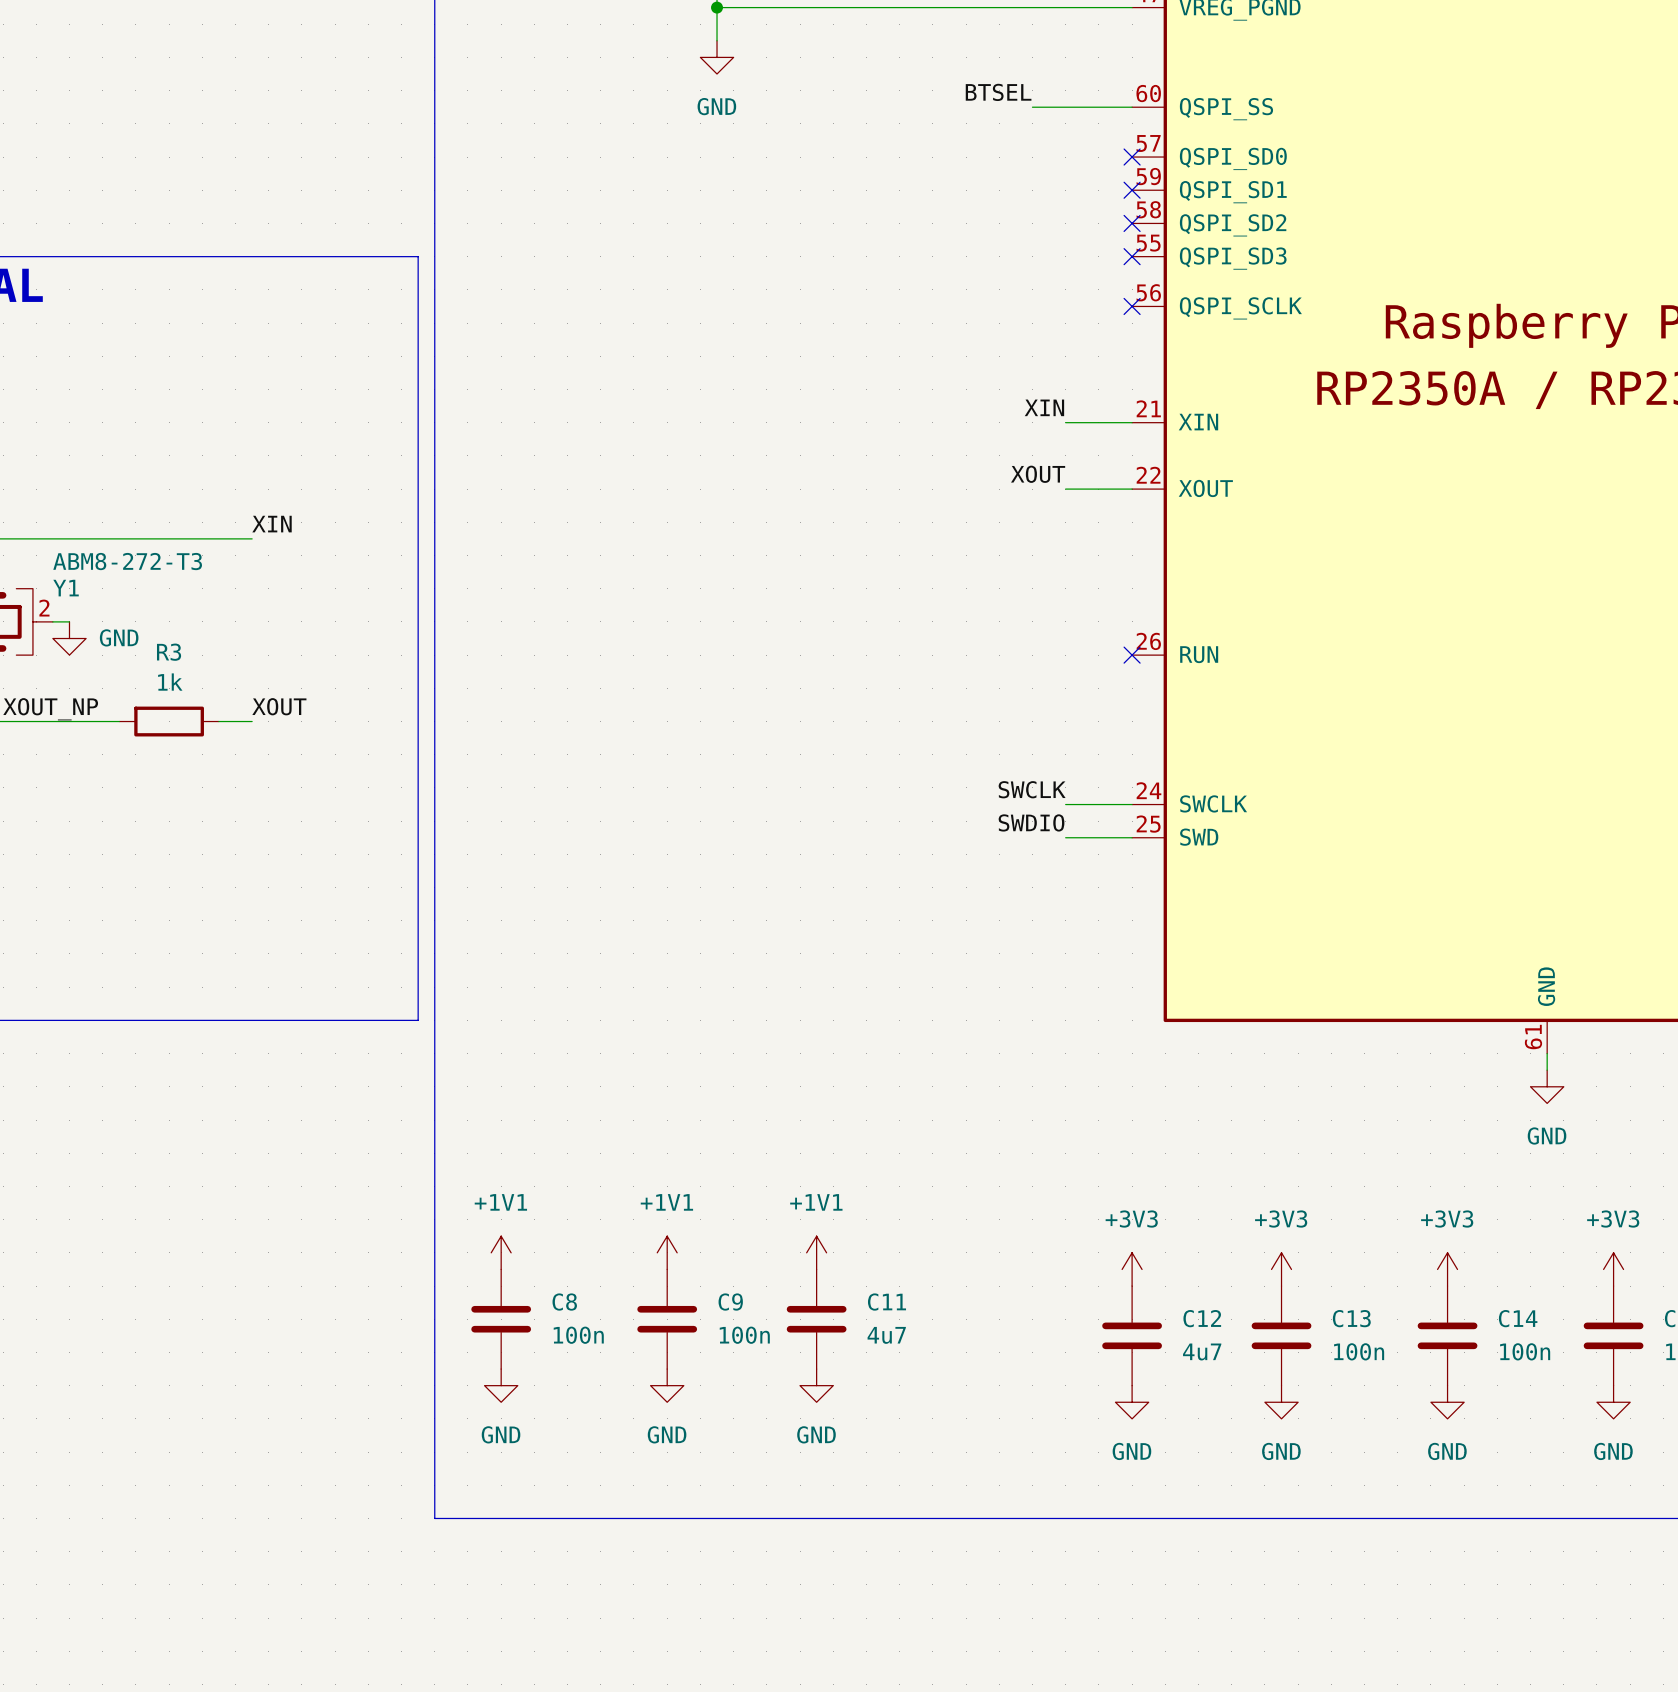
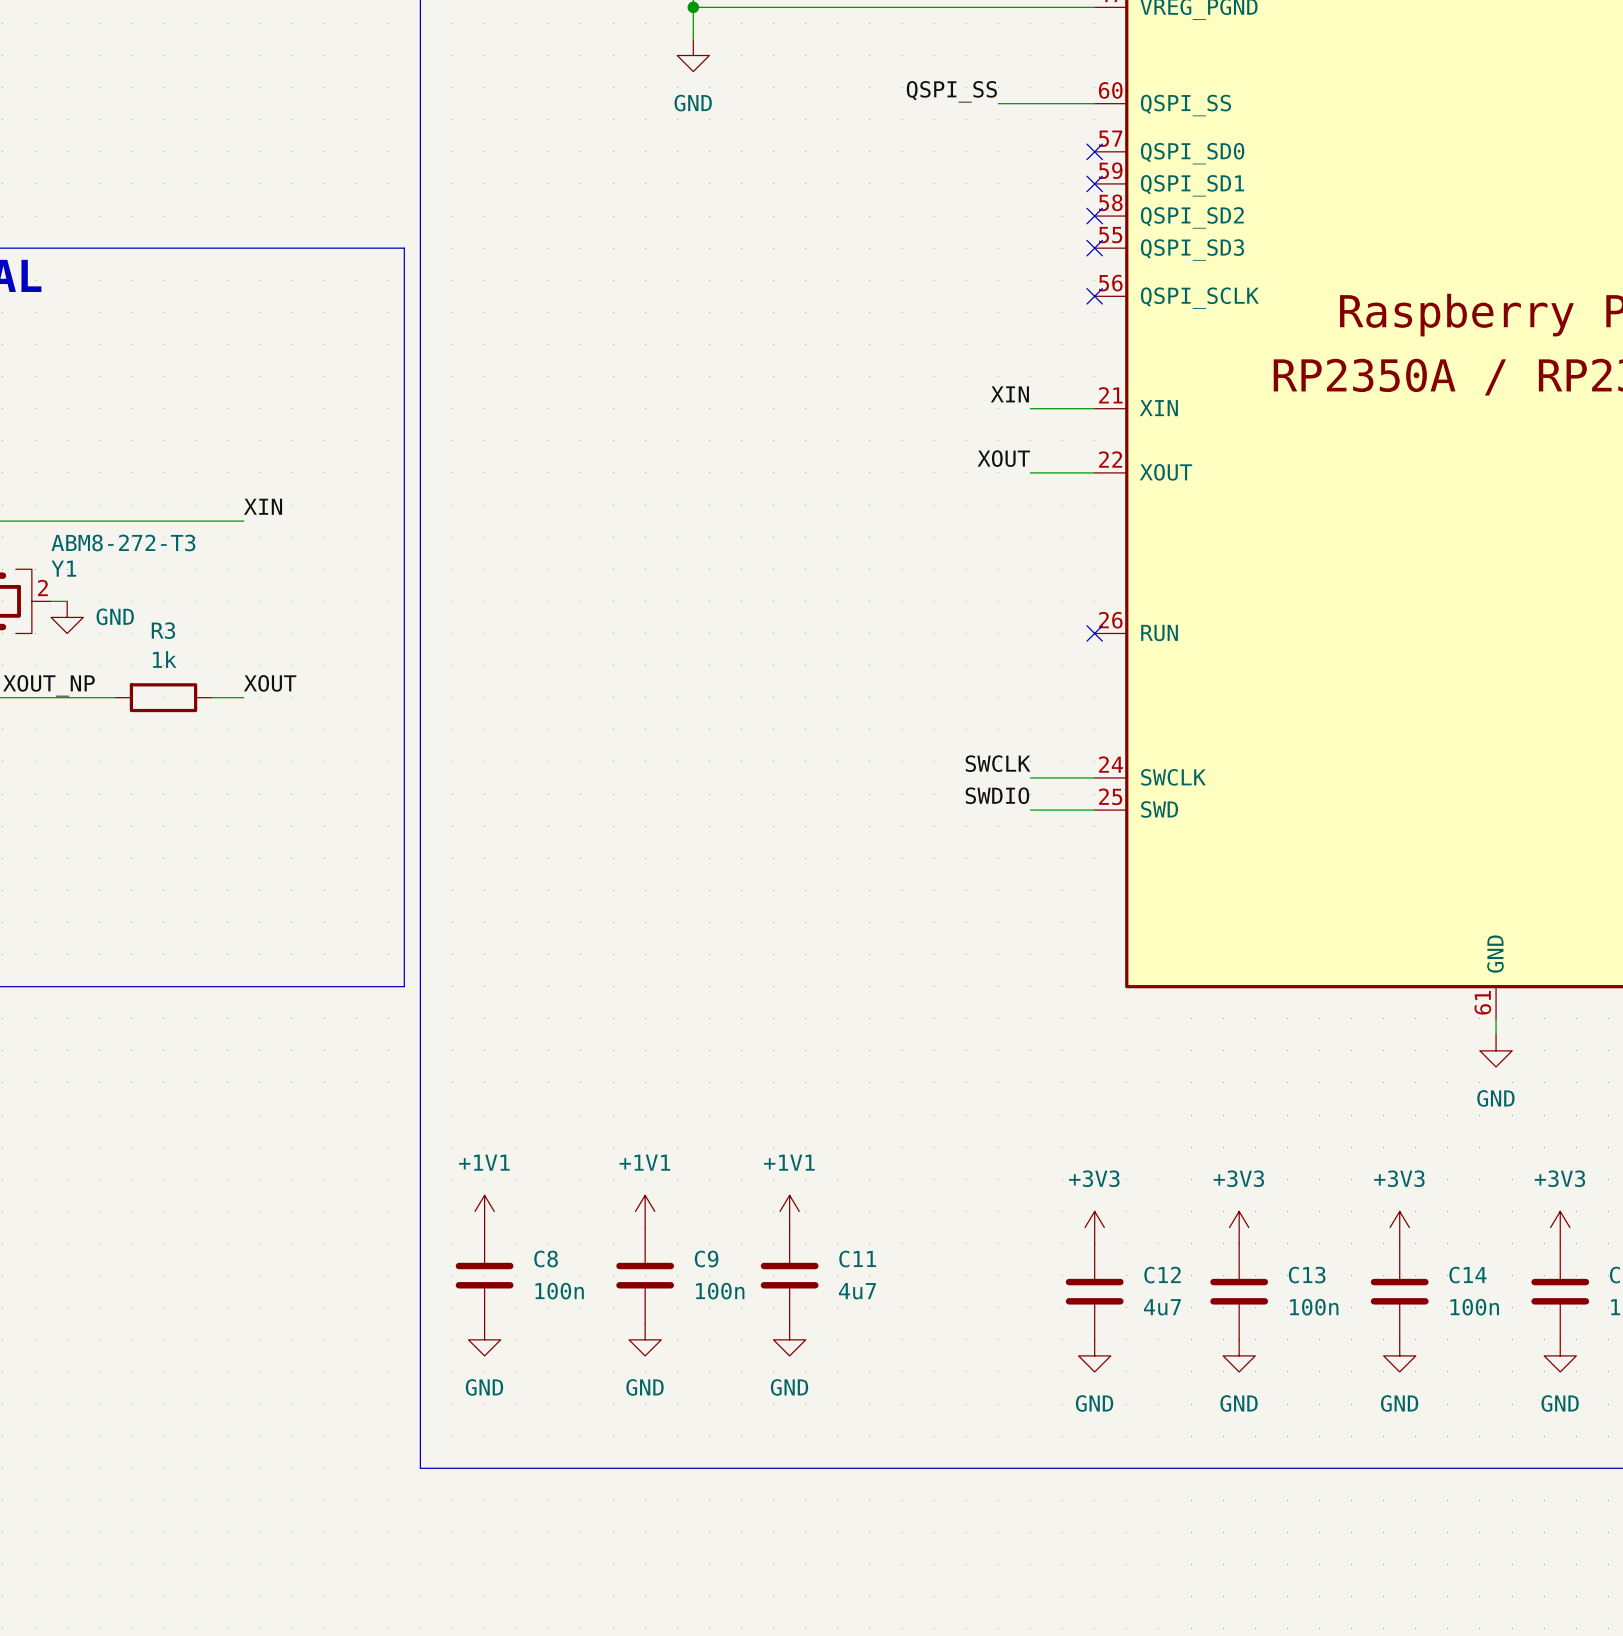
label: BTSEL (998, 92) -> QSPI_SS (951, 91)

